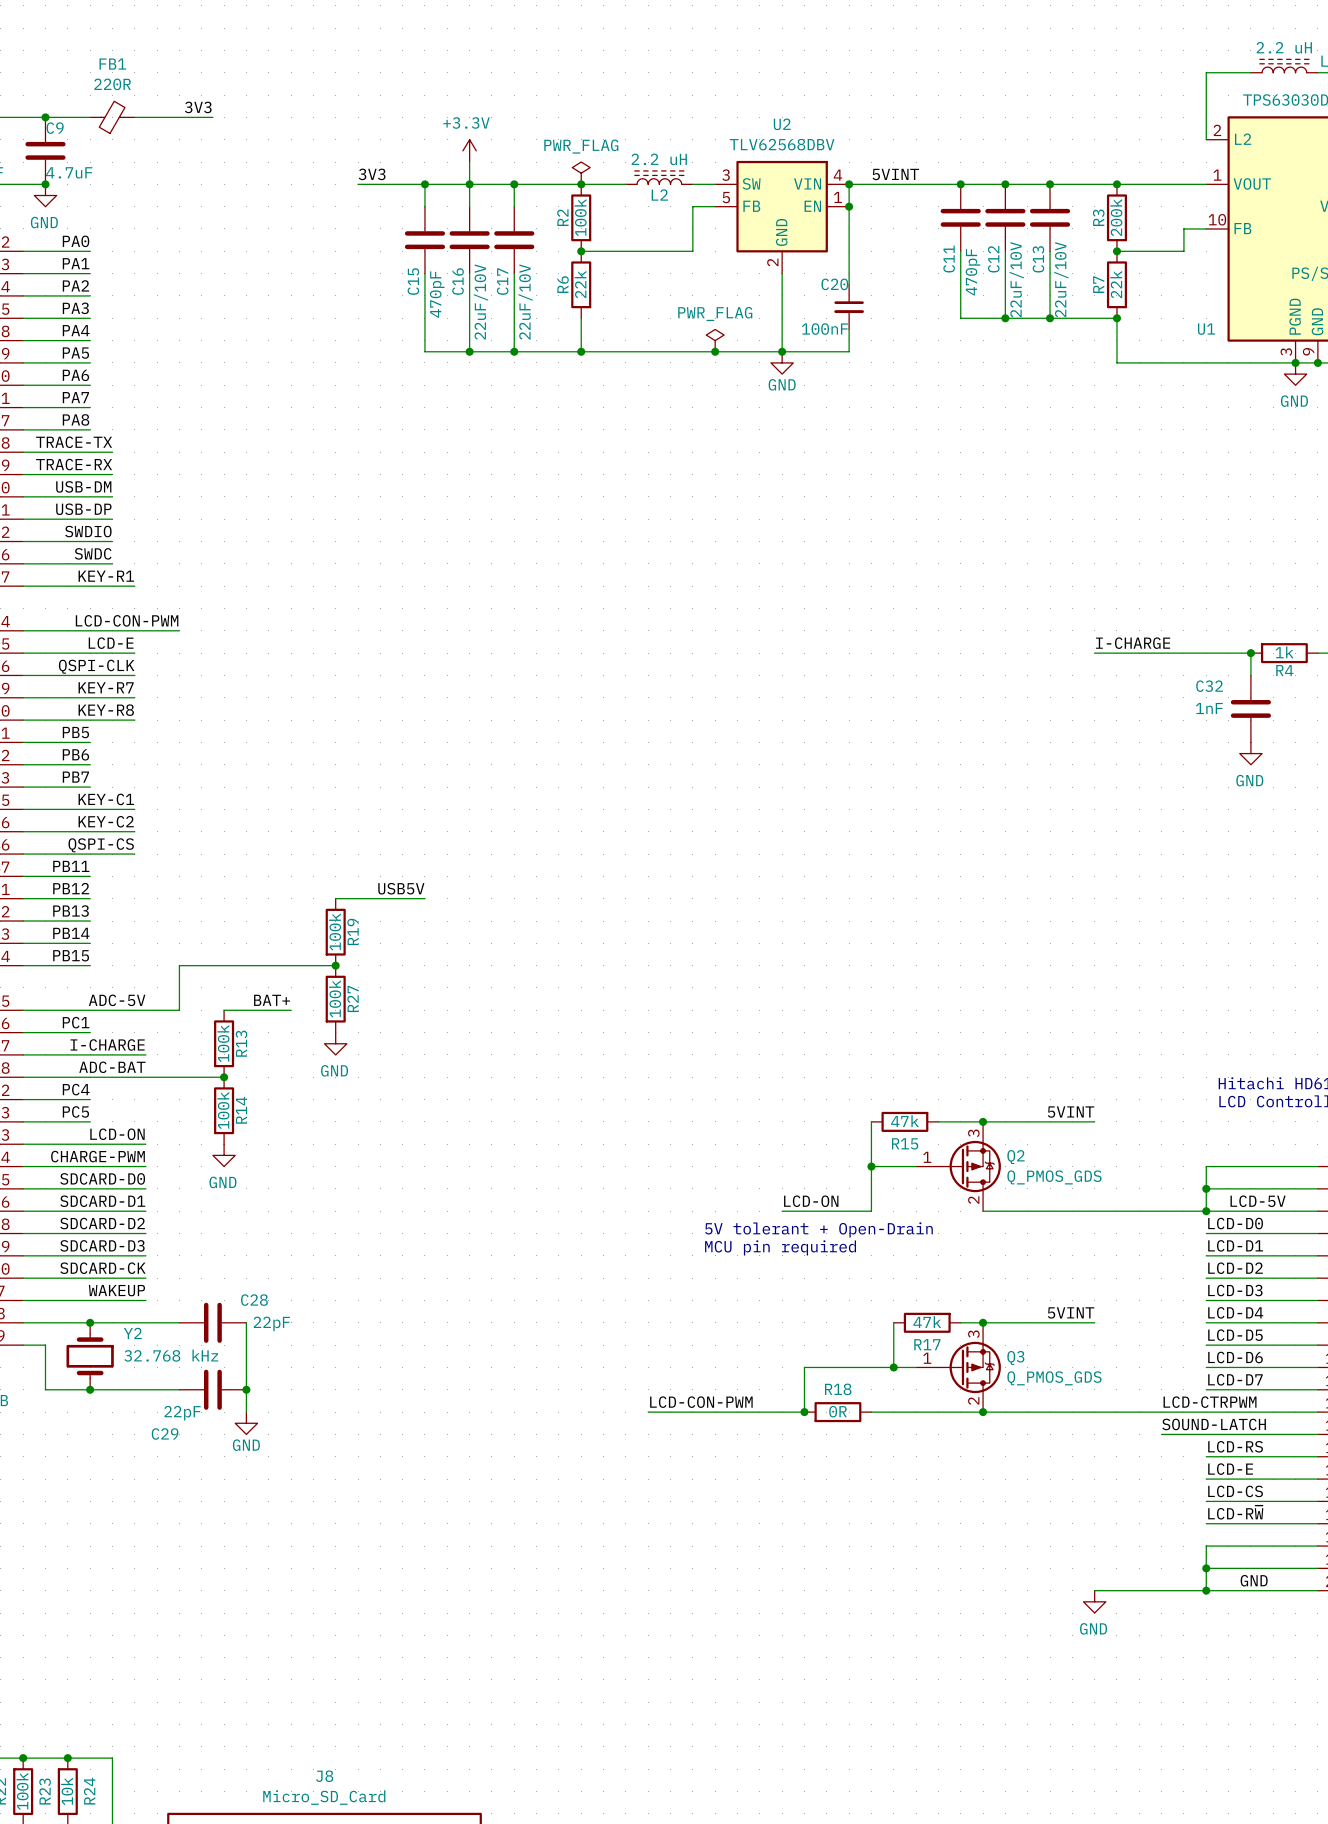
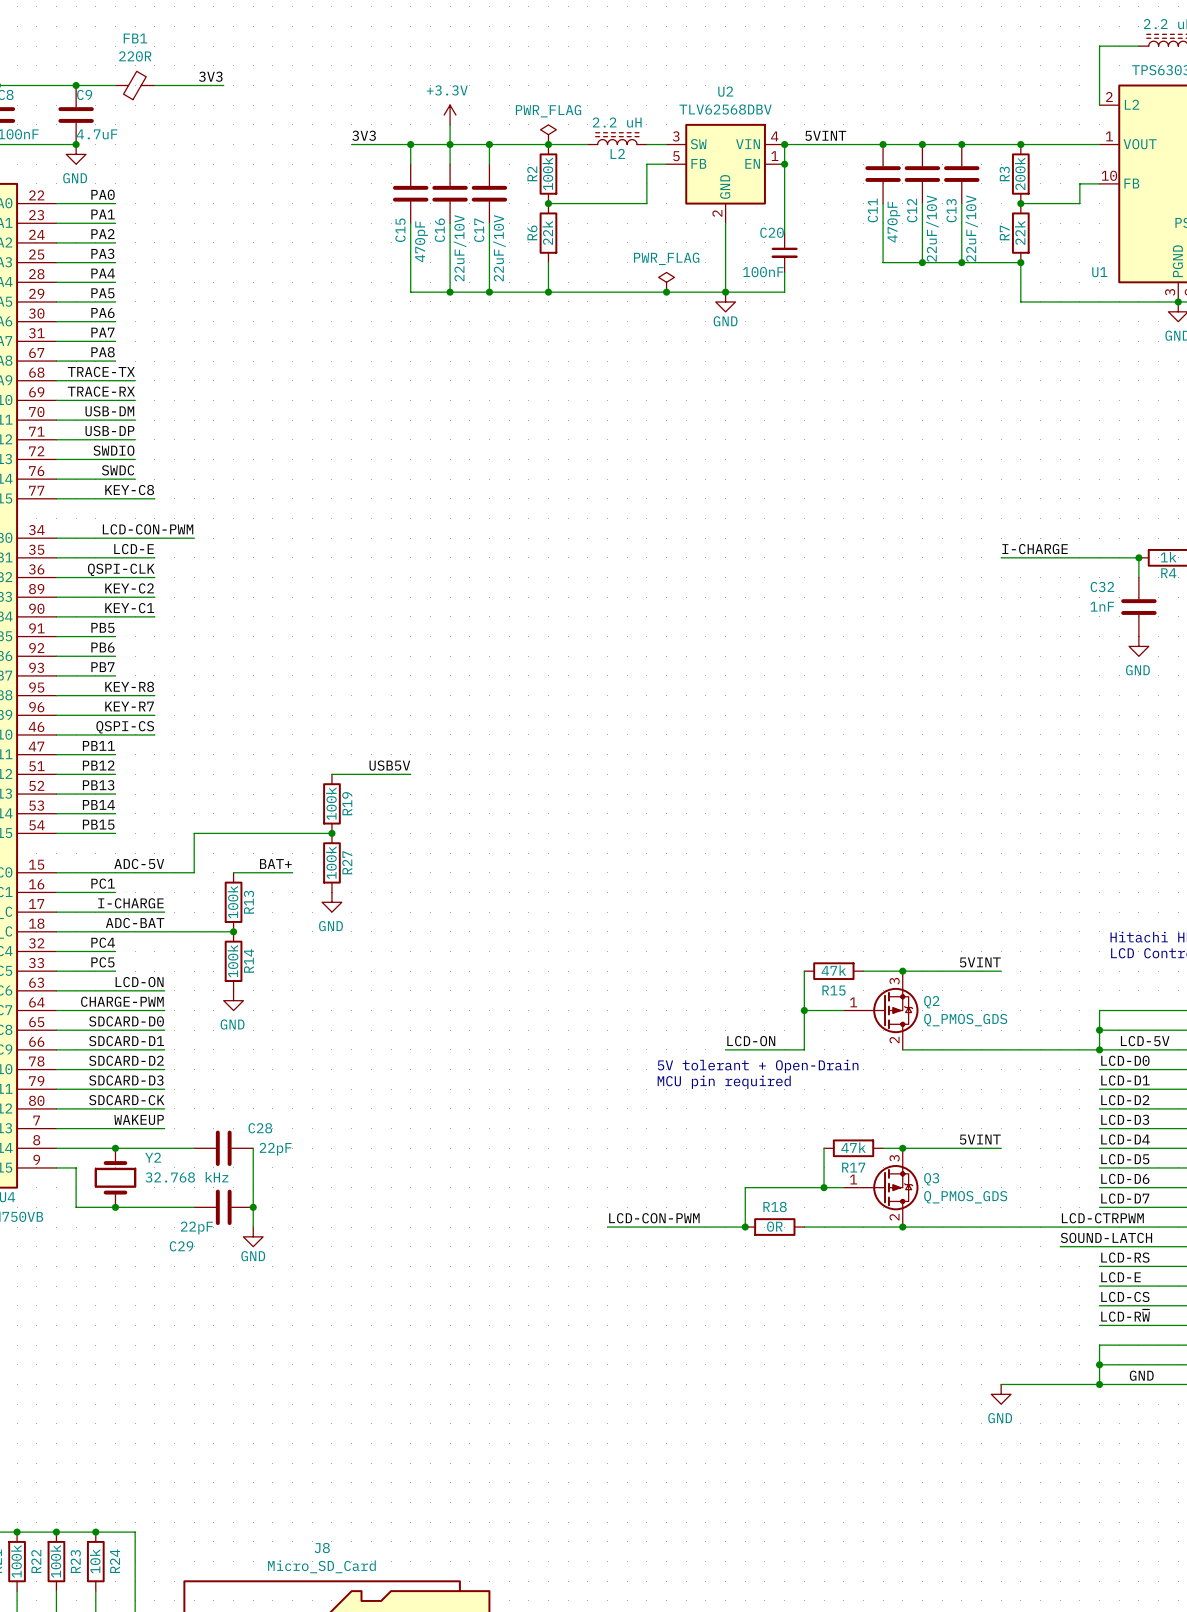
label: KEY-R1 (106, 576) -> KEY-C8 (129, 490)
label: KEY-R7 (106, 687) -> KEY-C2 (129, 588)
label: KEY-R8 (106, 710) -> KEY-C1 (129, 608)
label: KEY-C1 (106, 799) -> KEY-R8 (129, 686)
label: KEY-C2 (106, 821) -> KEY-R7 (129, 706)

